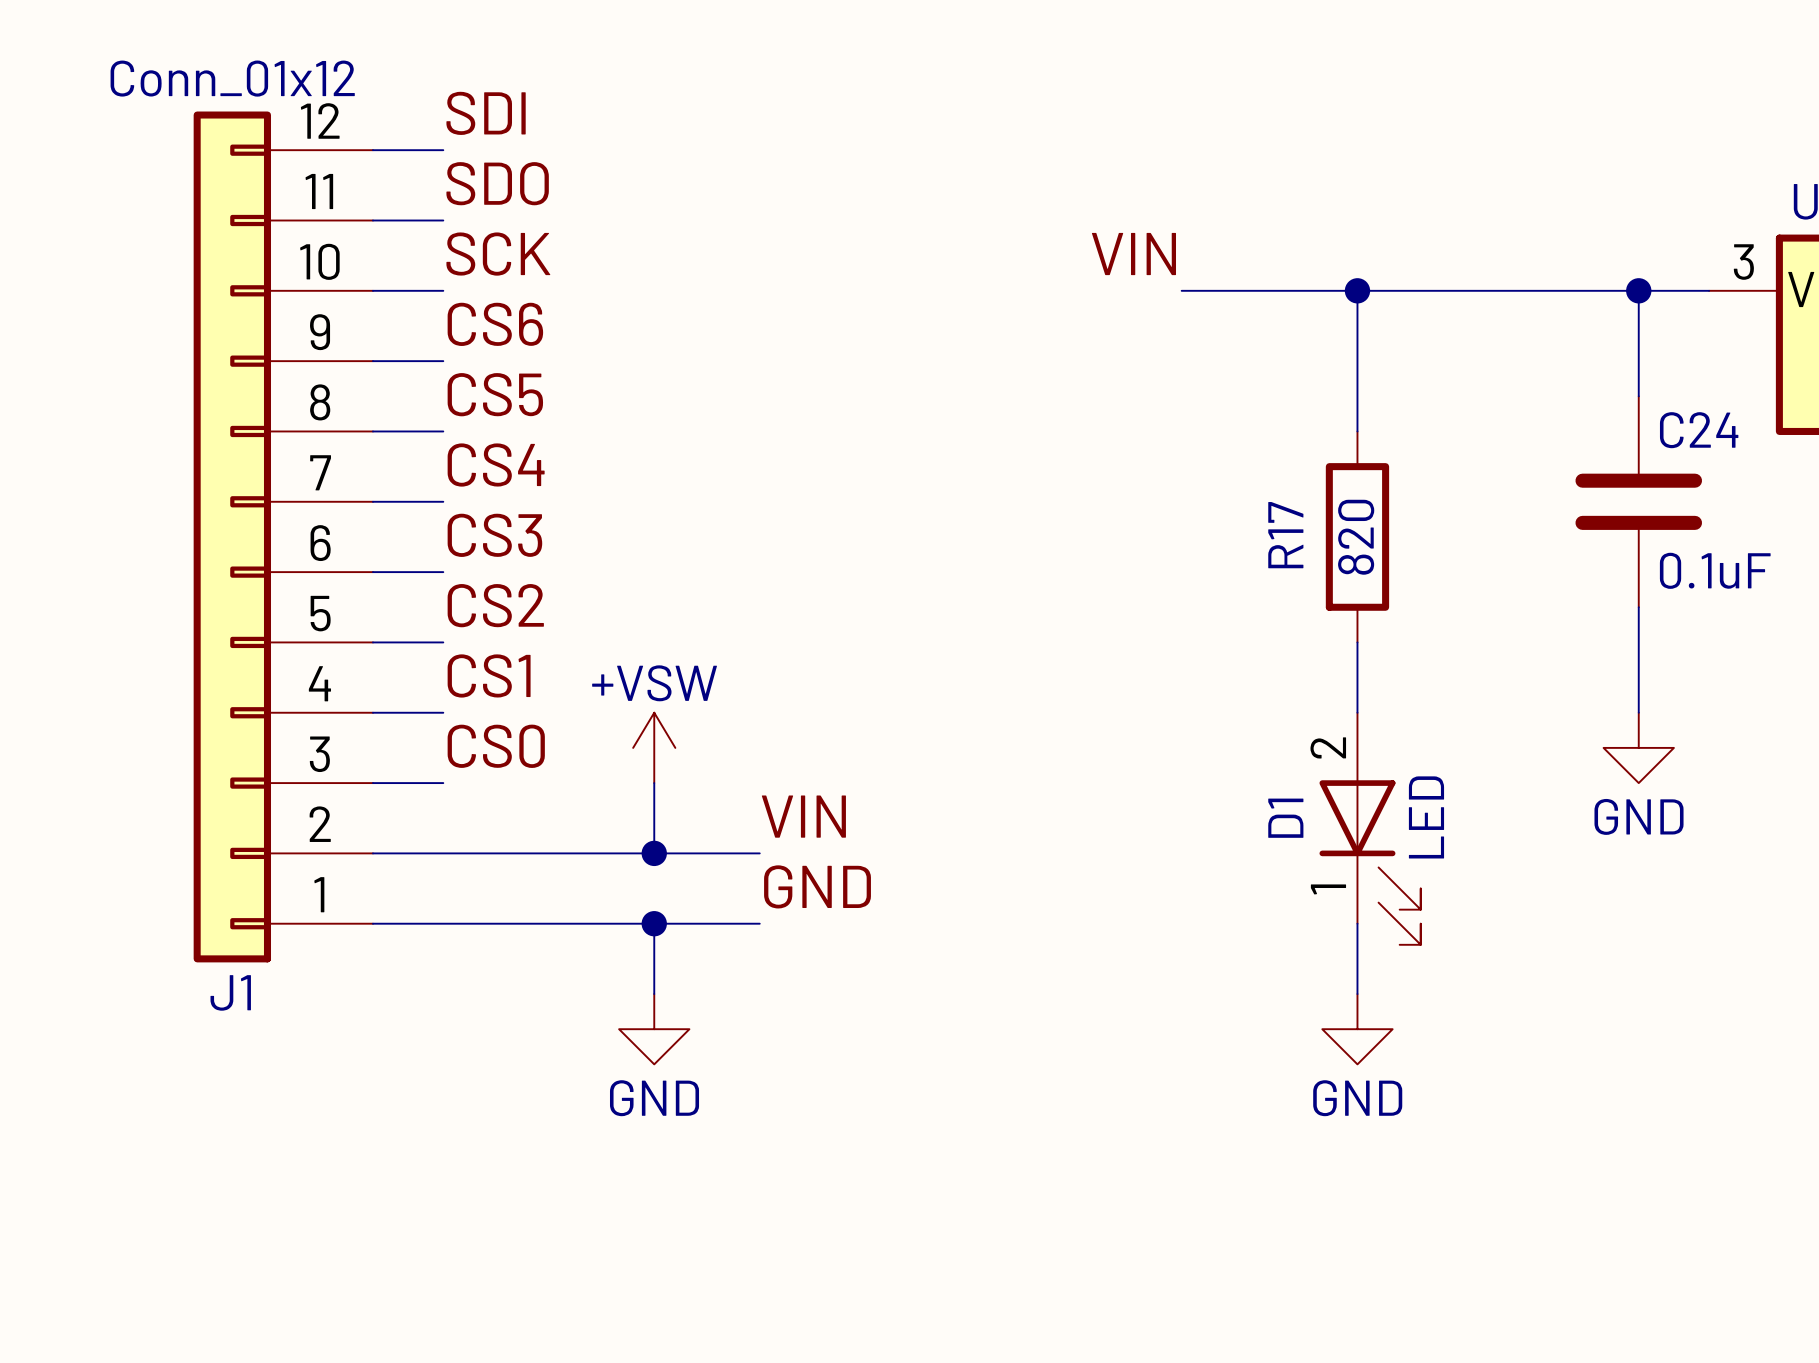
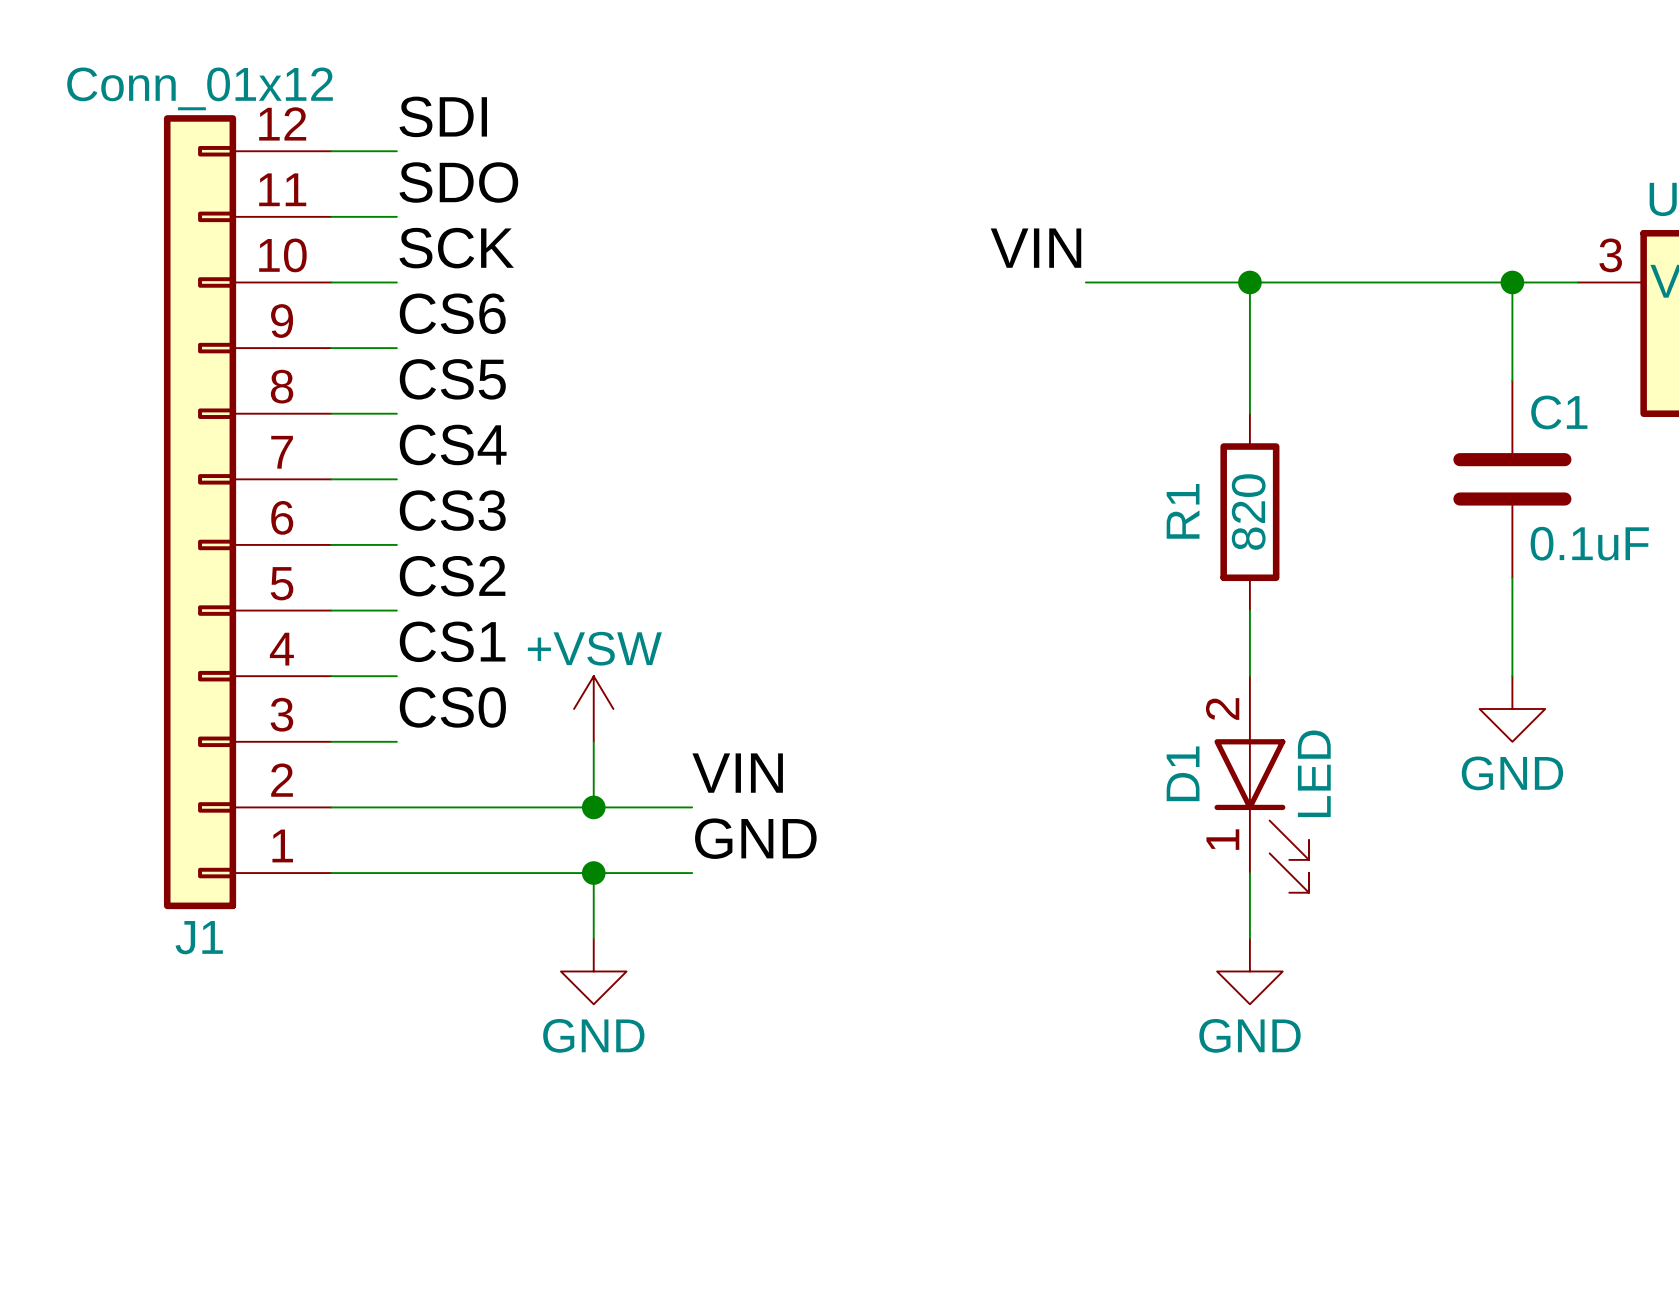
C24 name: C24 (1699, 430) -> C1 (1559, 412)
R17 name: R17 (1285, 535) -> R1 (1183, 511)

